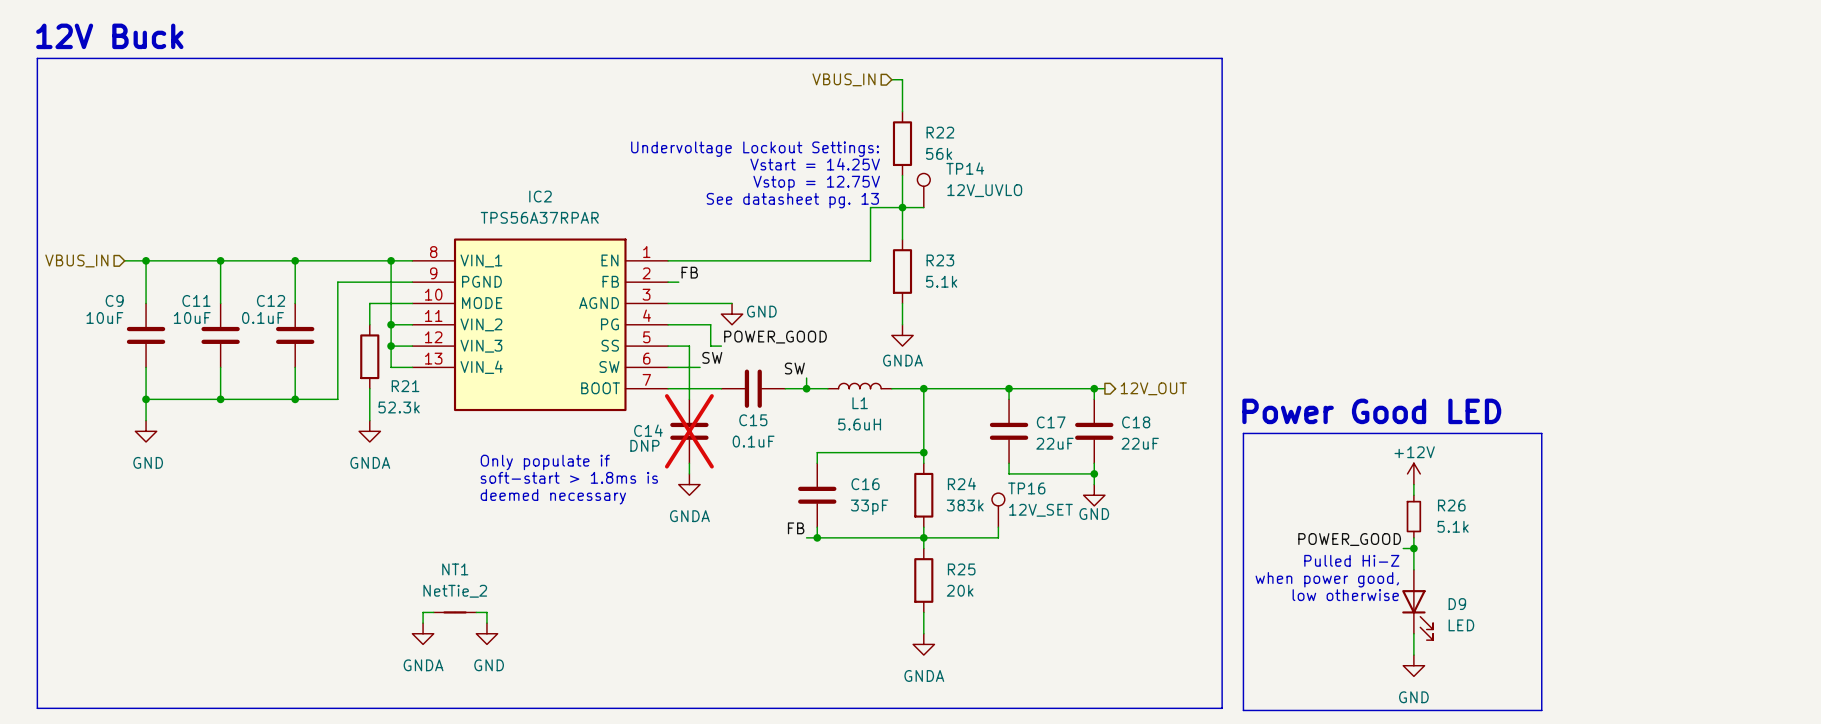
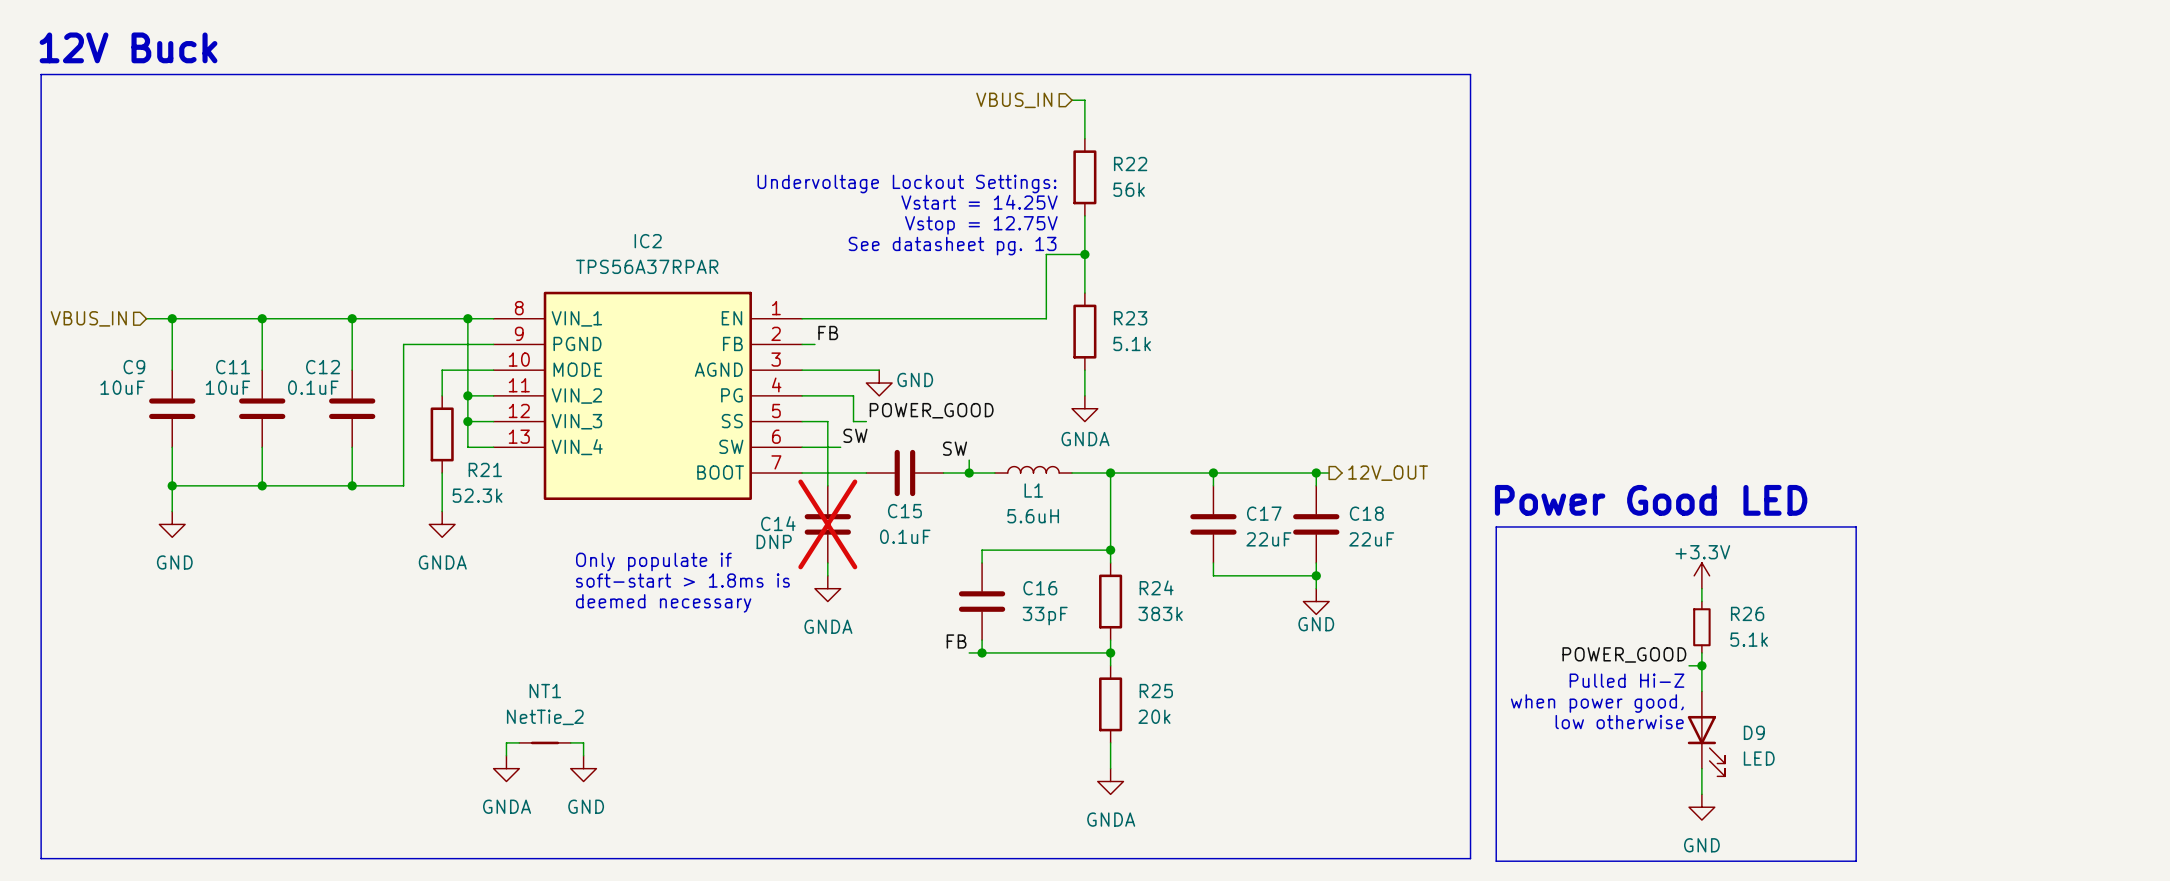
TP14: 12V_UVLO (923, 190) -> none
wire: (902, 207) (923, 207) -> none
power symbol: +12V (1413, 473) -> +3.3V (1701, 575)
TP16: 12V_SET (998, 510) -> none
wire: (998, 527) (998, 537) (923, 537) -> none

